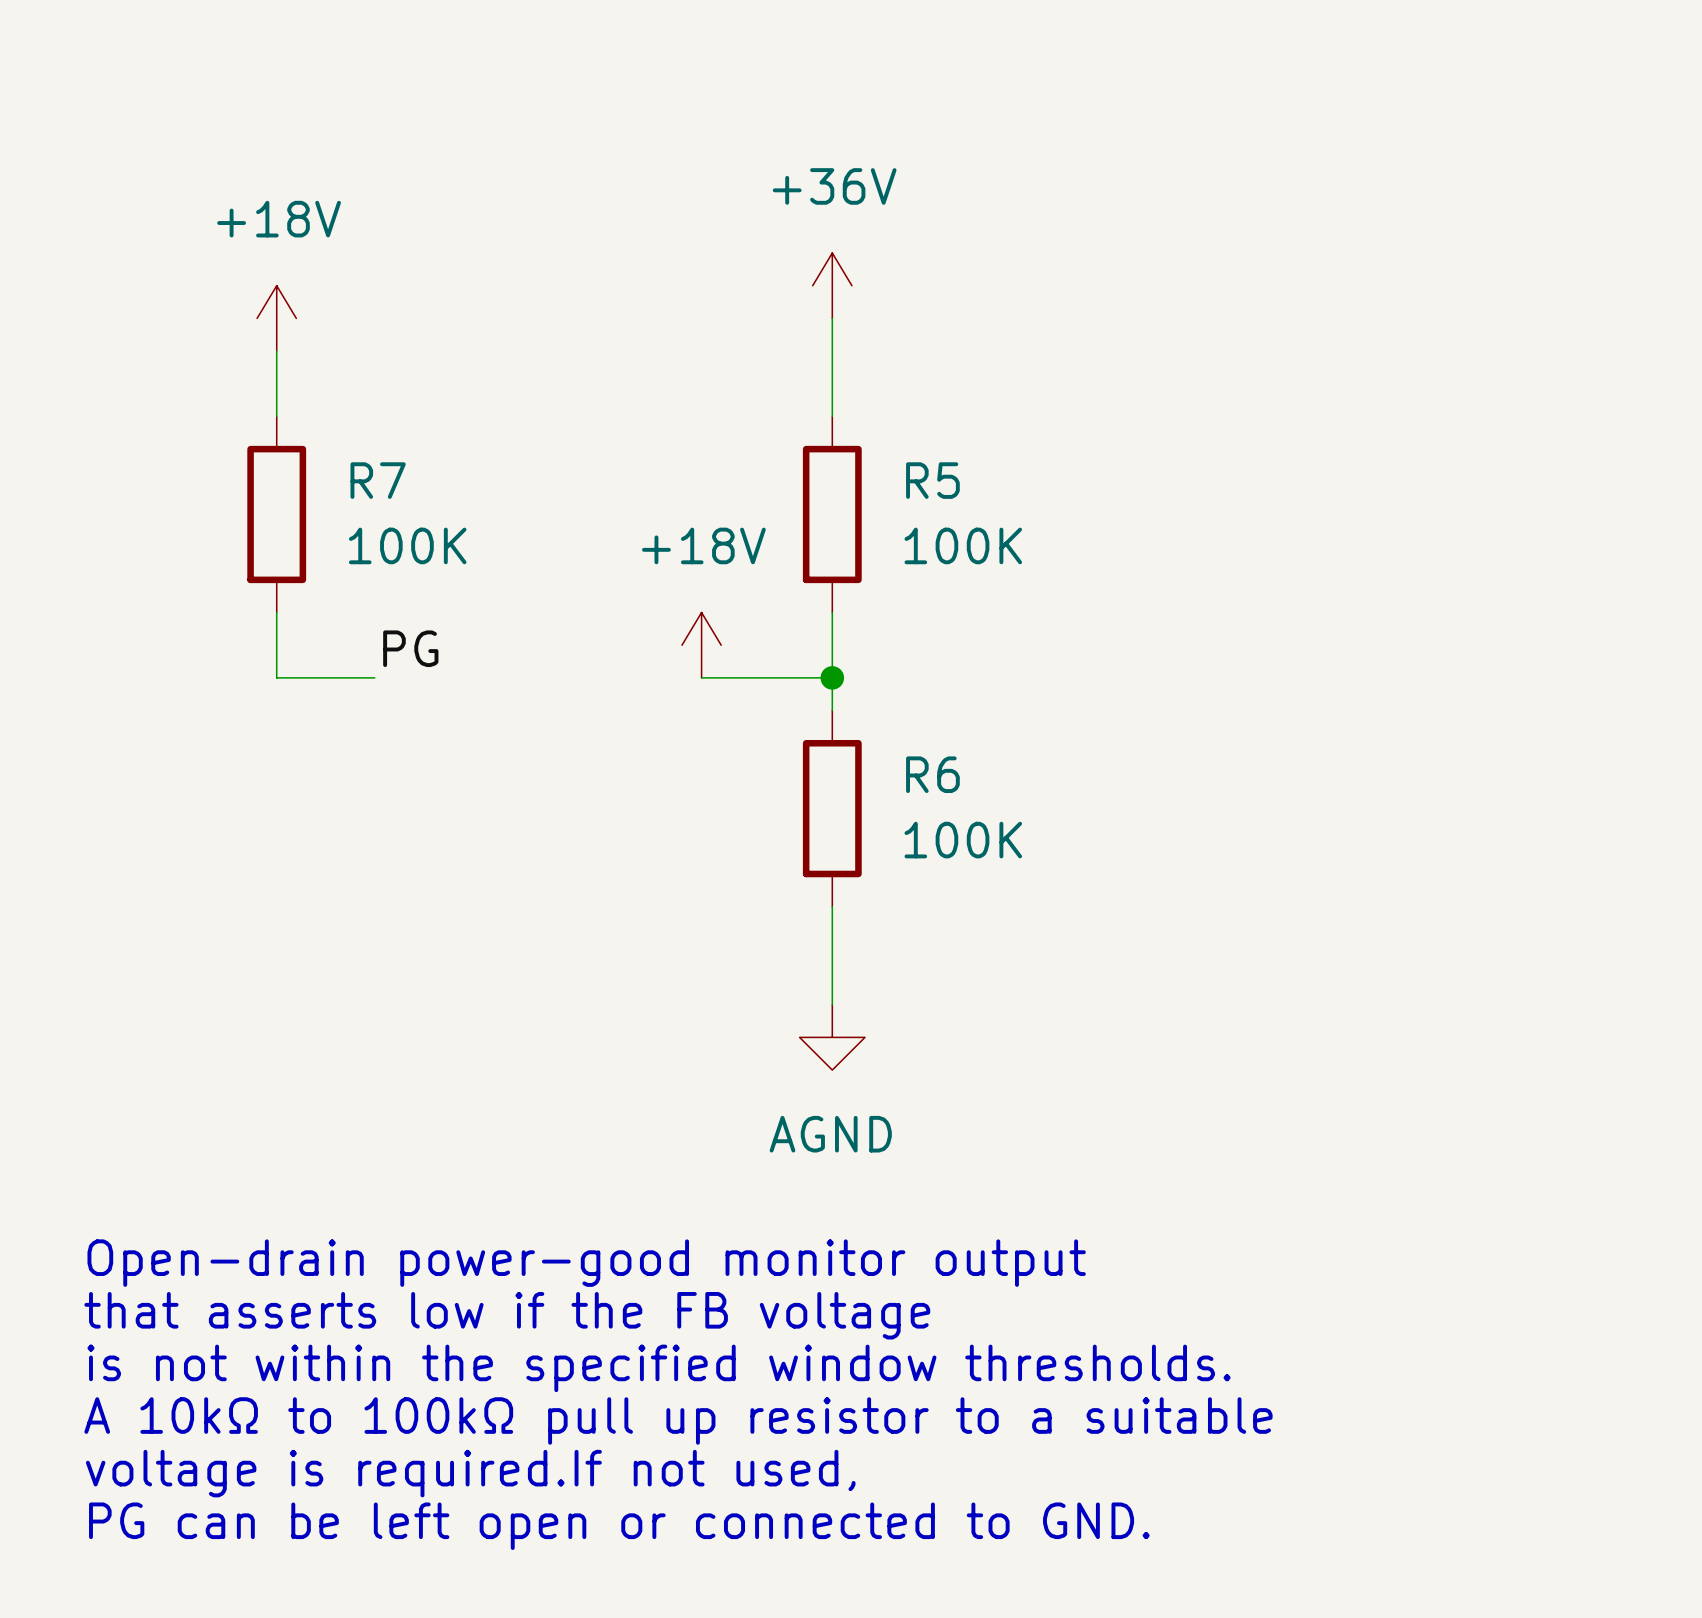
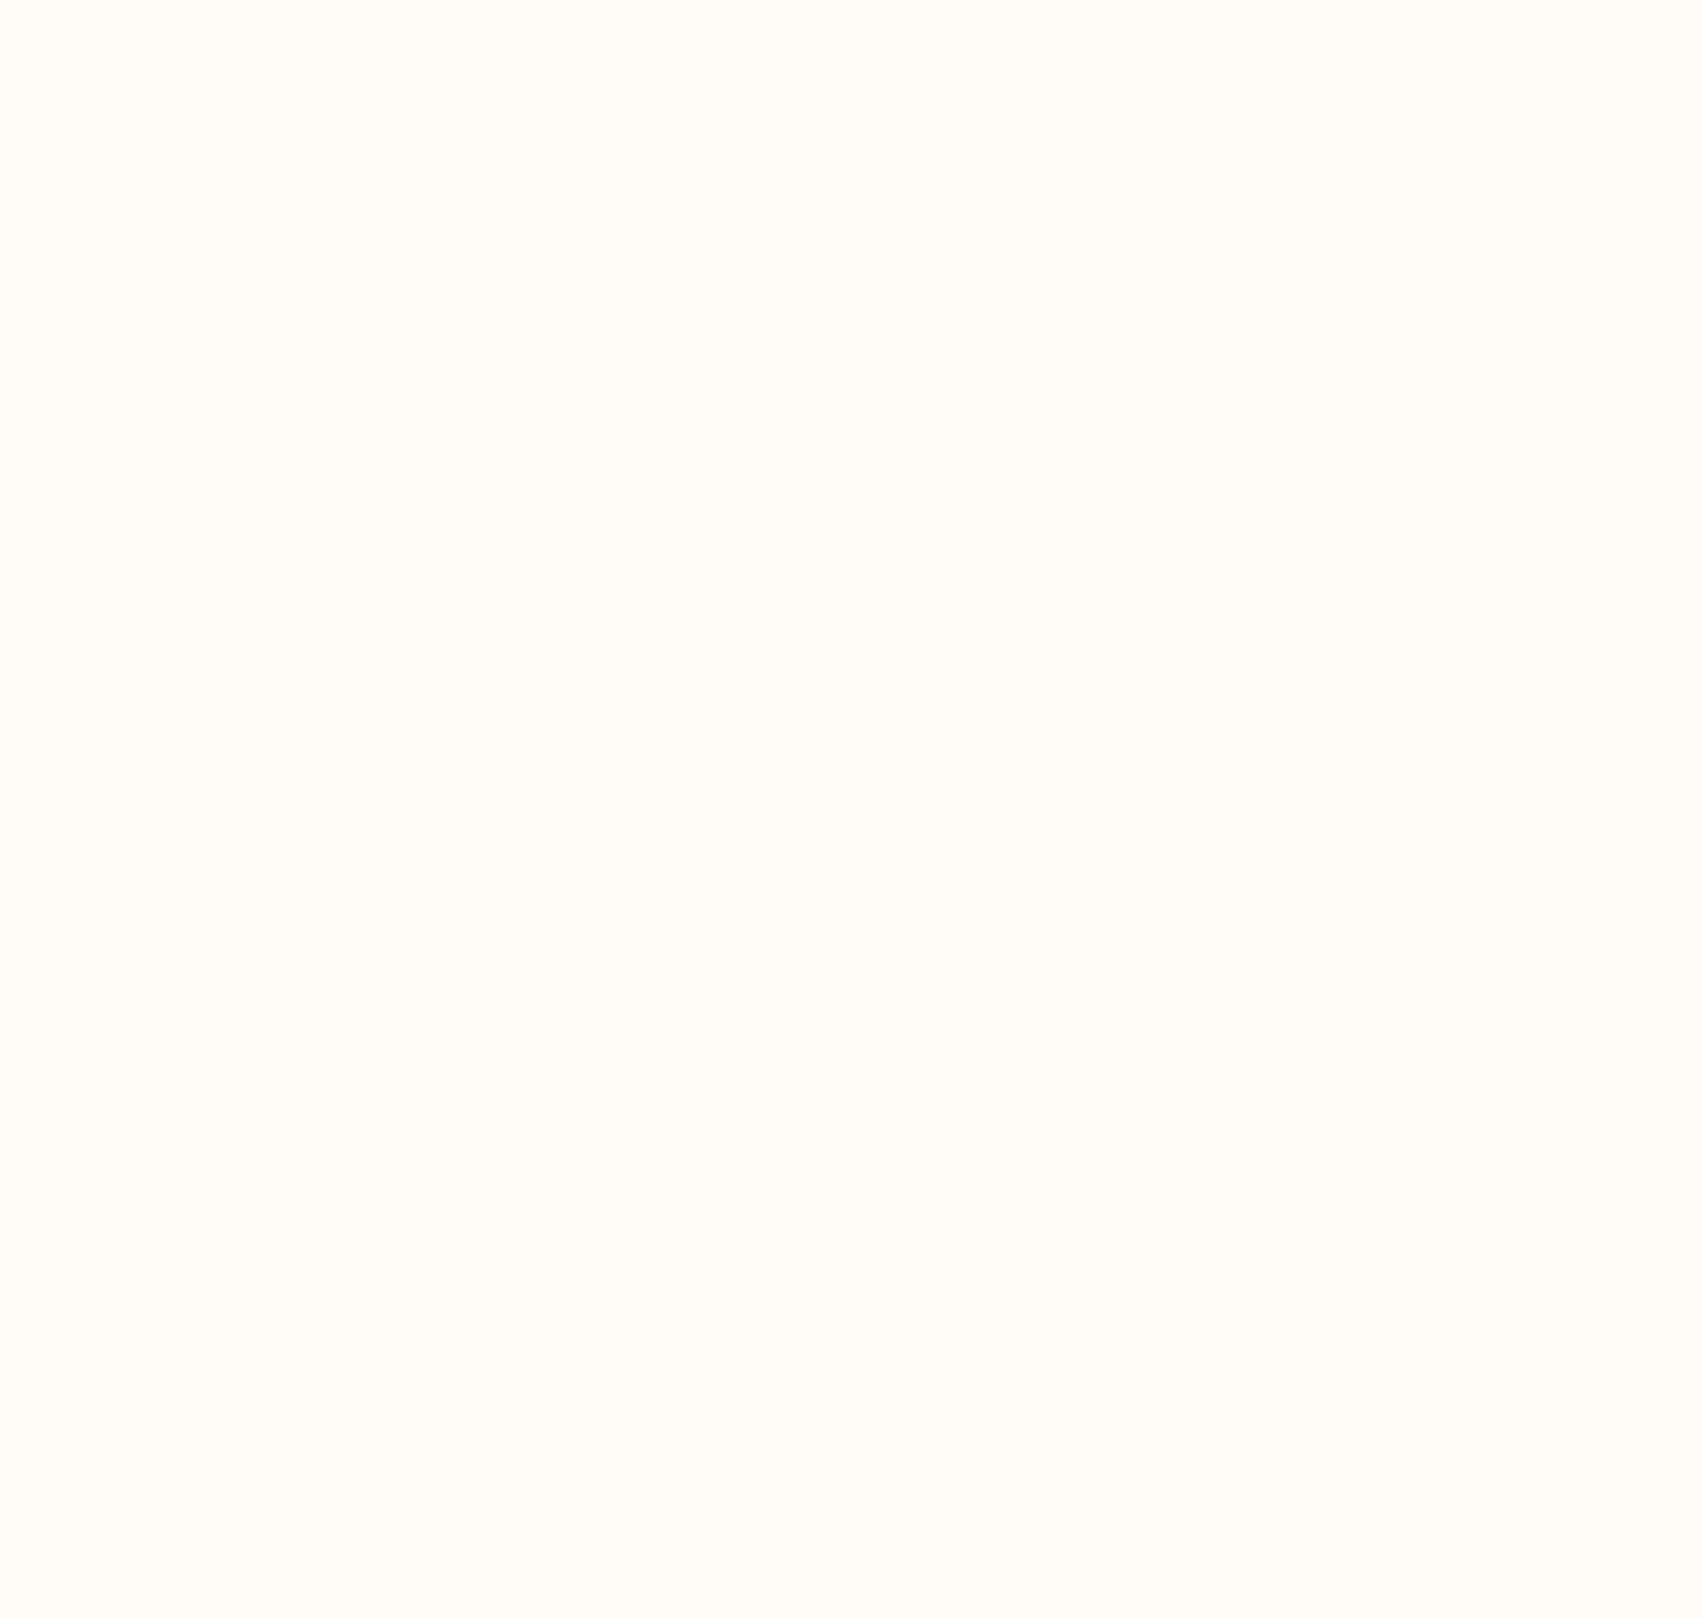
power symbol: +36V (832, 285) -> none
power symbol: +18V (276, 318) -> none
wire: (832, 318) (832, 416) -> none
wire: (276, 351) (276, 416) -> none
R7: 100K (276, 514) -> none
R5: 100K (832, 514) -> none
wire: (276, 612) (276, 677) (374, 677) -> none
wire: (832, 612) (832, 710) -> none
power symbol: +18V (701, 645) -> none
label: PG (410, 648) -> none
wire: (701, 677) (832, 677) -> none
junction: (832, 677) -> none
R6: 100K (832, 808) -> none
wire: (832, 906) (832, 1004) -> none
power symbol: AGND (832, 1037) -> none
text: Open-drain power-good monitor output (586, 1263) -> none
text: that asserts low if the FB voltage (507, 1315) -> none
text: is not within the specified window thresholds. (659, 1368) -> none
text: A 10kΩ to 100kΩ pull up resistor to a suitable (678, 1420) -> none
text: voltage is required.If not used, (470, 1473) -> none
text: PG can be left open or connected to GND. (619, 1526) -> none

